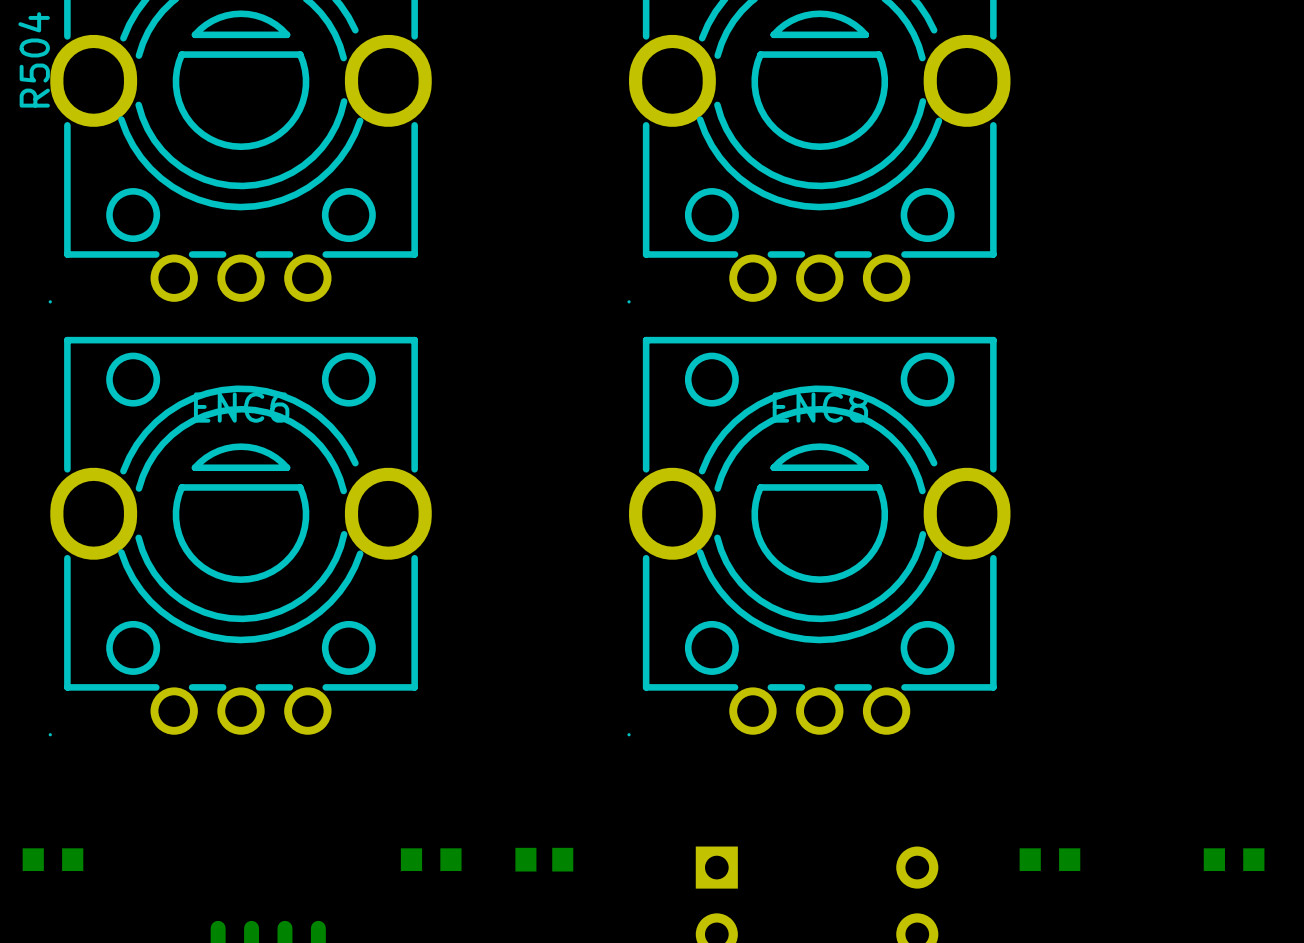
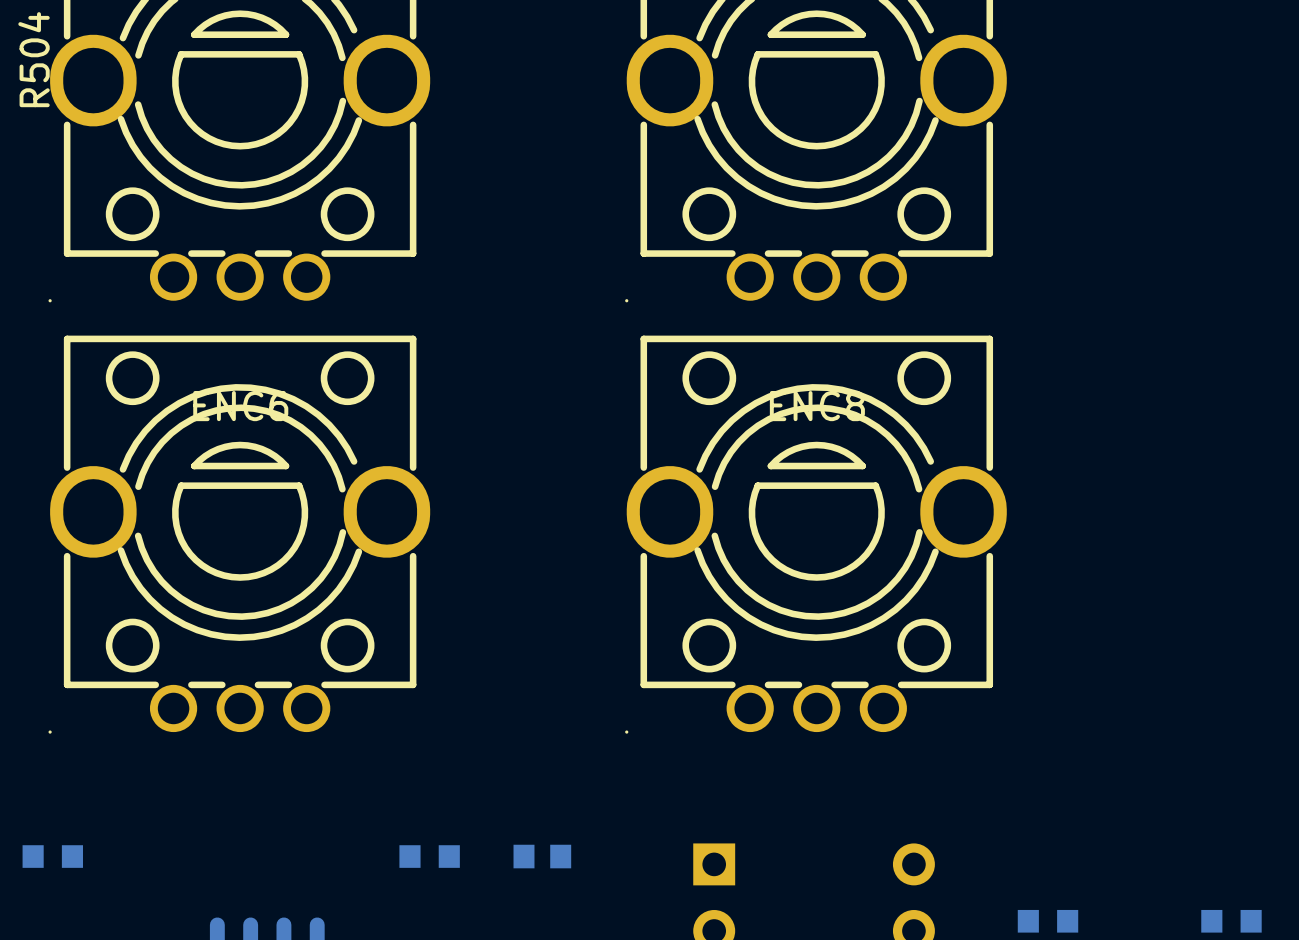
part: (1049, 859) -> none
part position: (1234, 859) -> (1231, 921)
part: none -> (1048, 921)

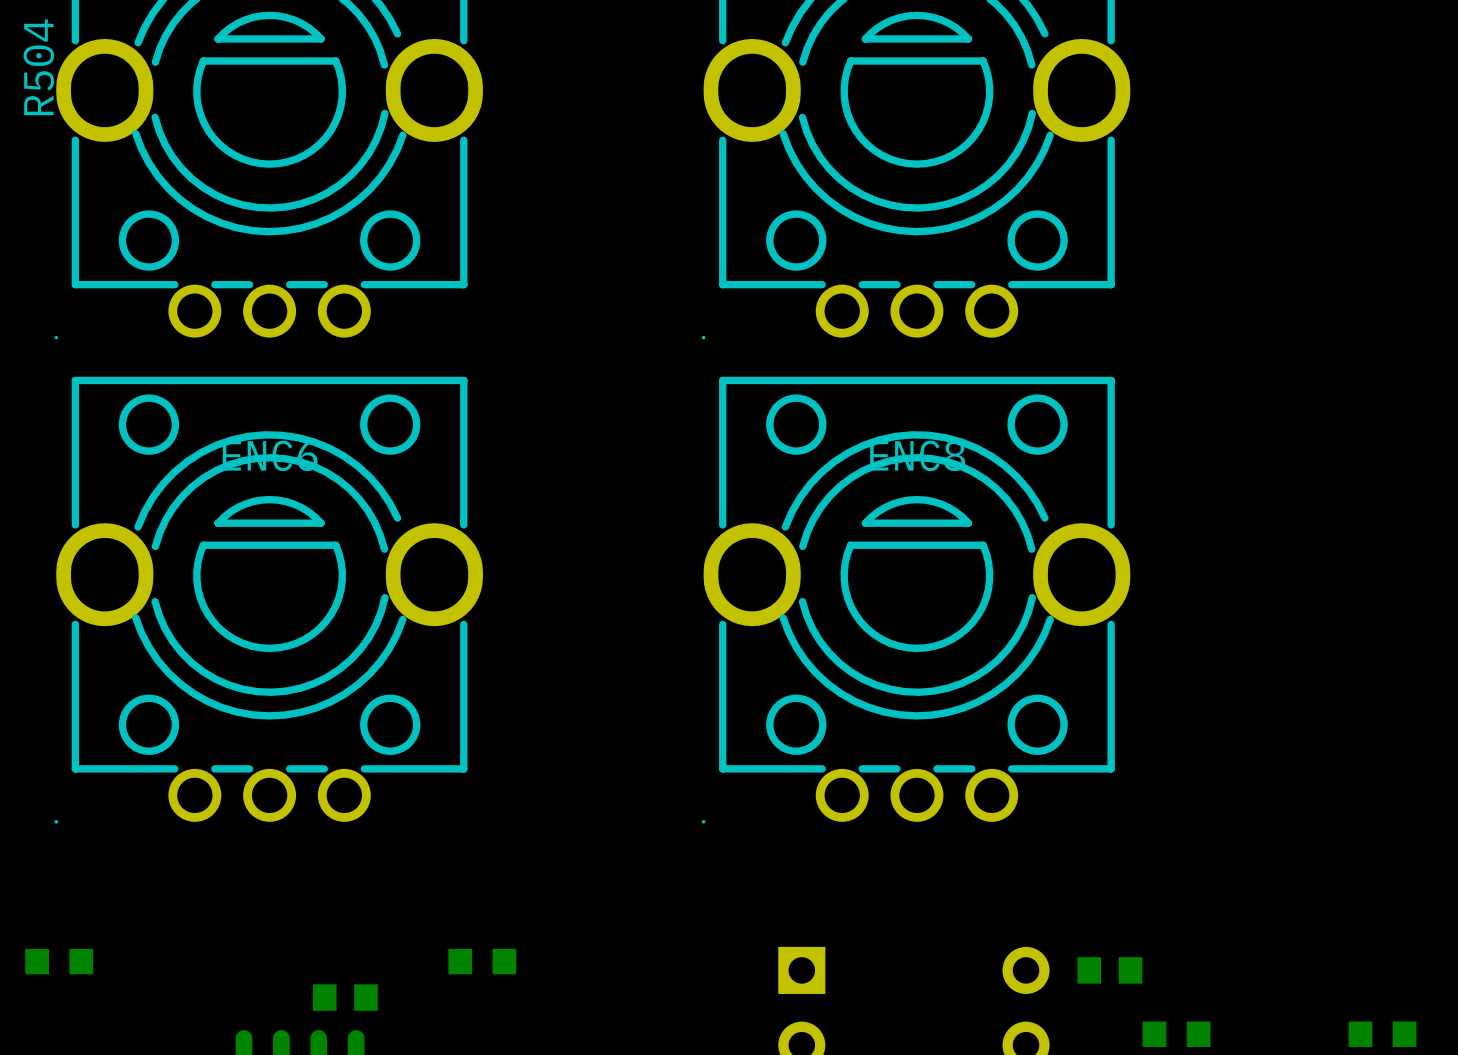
part: (542, 856) -> none
part: none -> (1109, 970)
part: none -> (345, 997)

